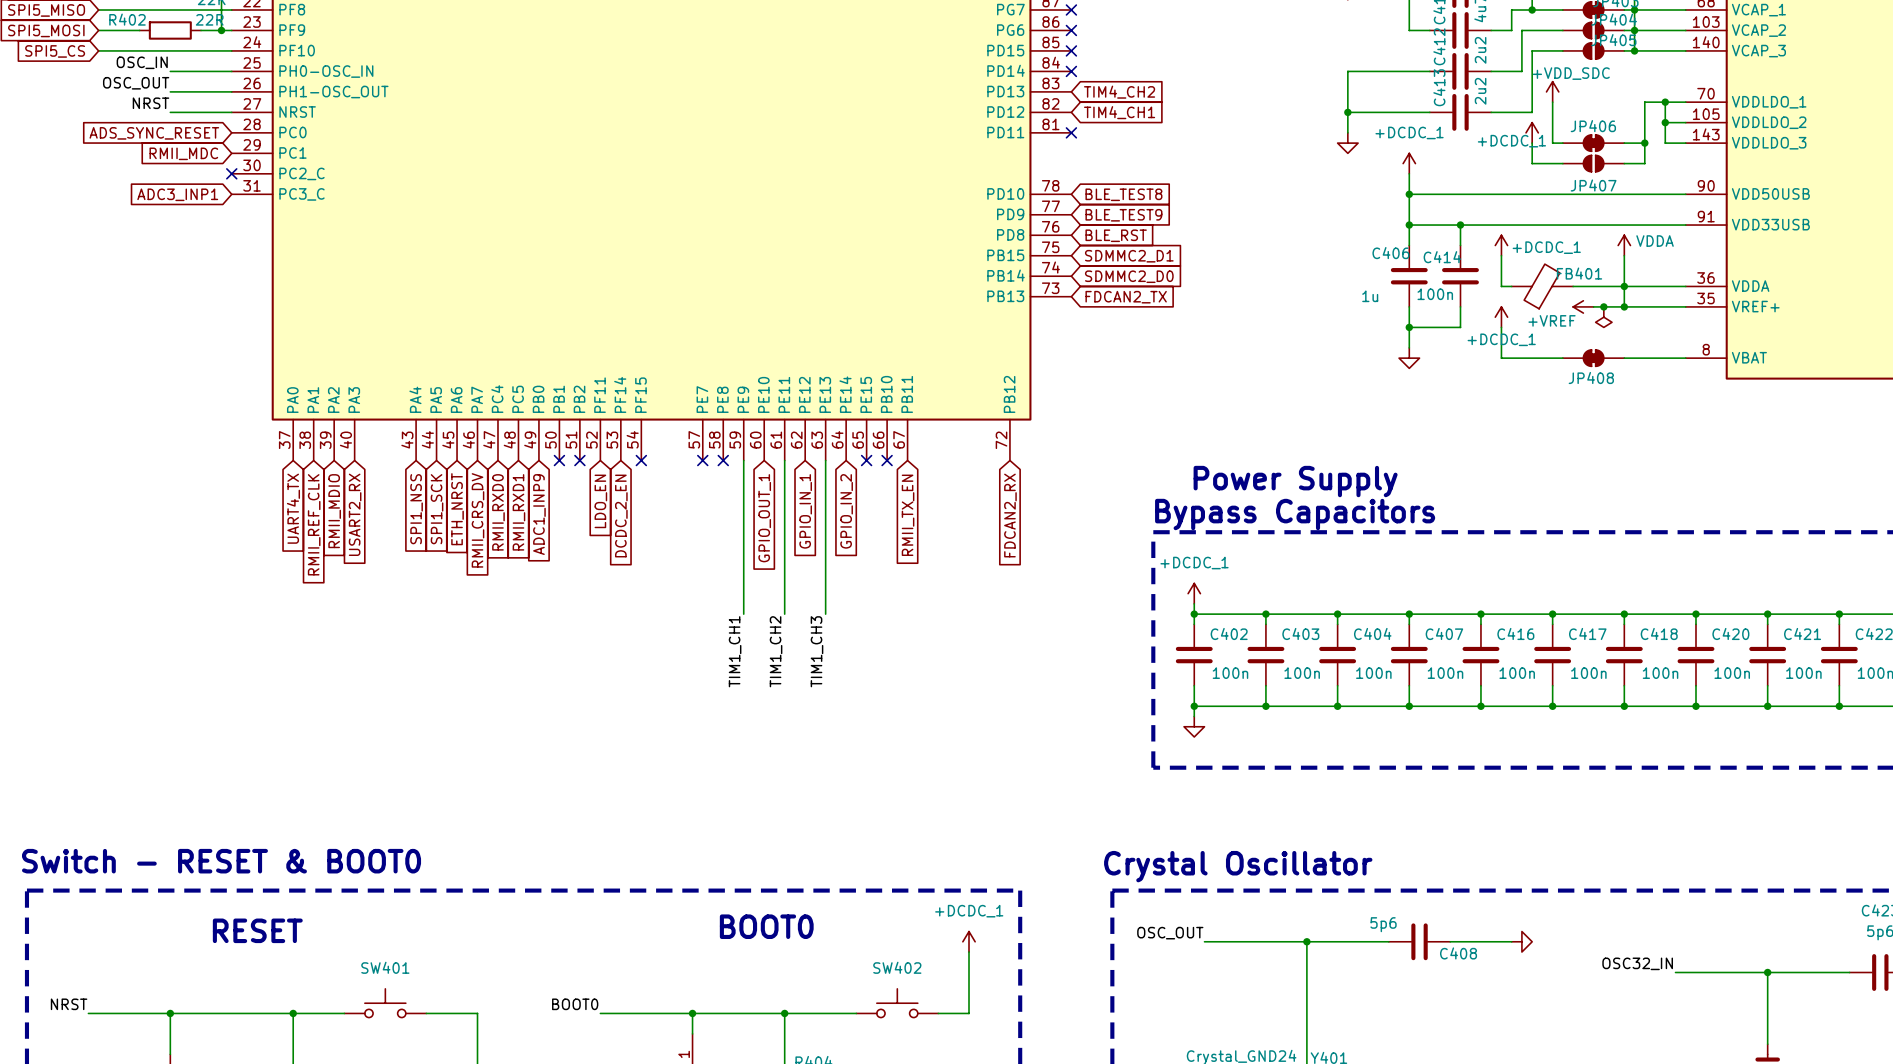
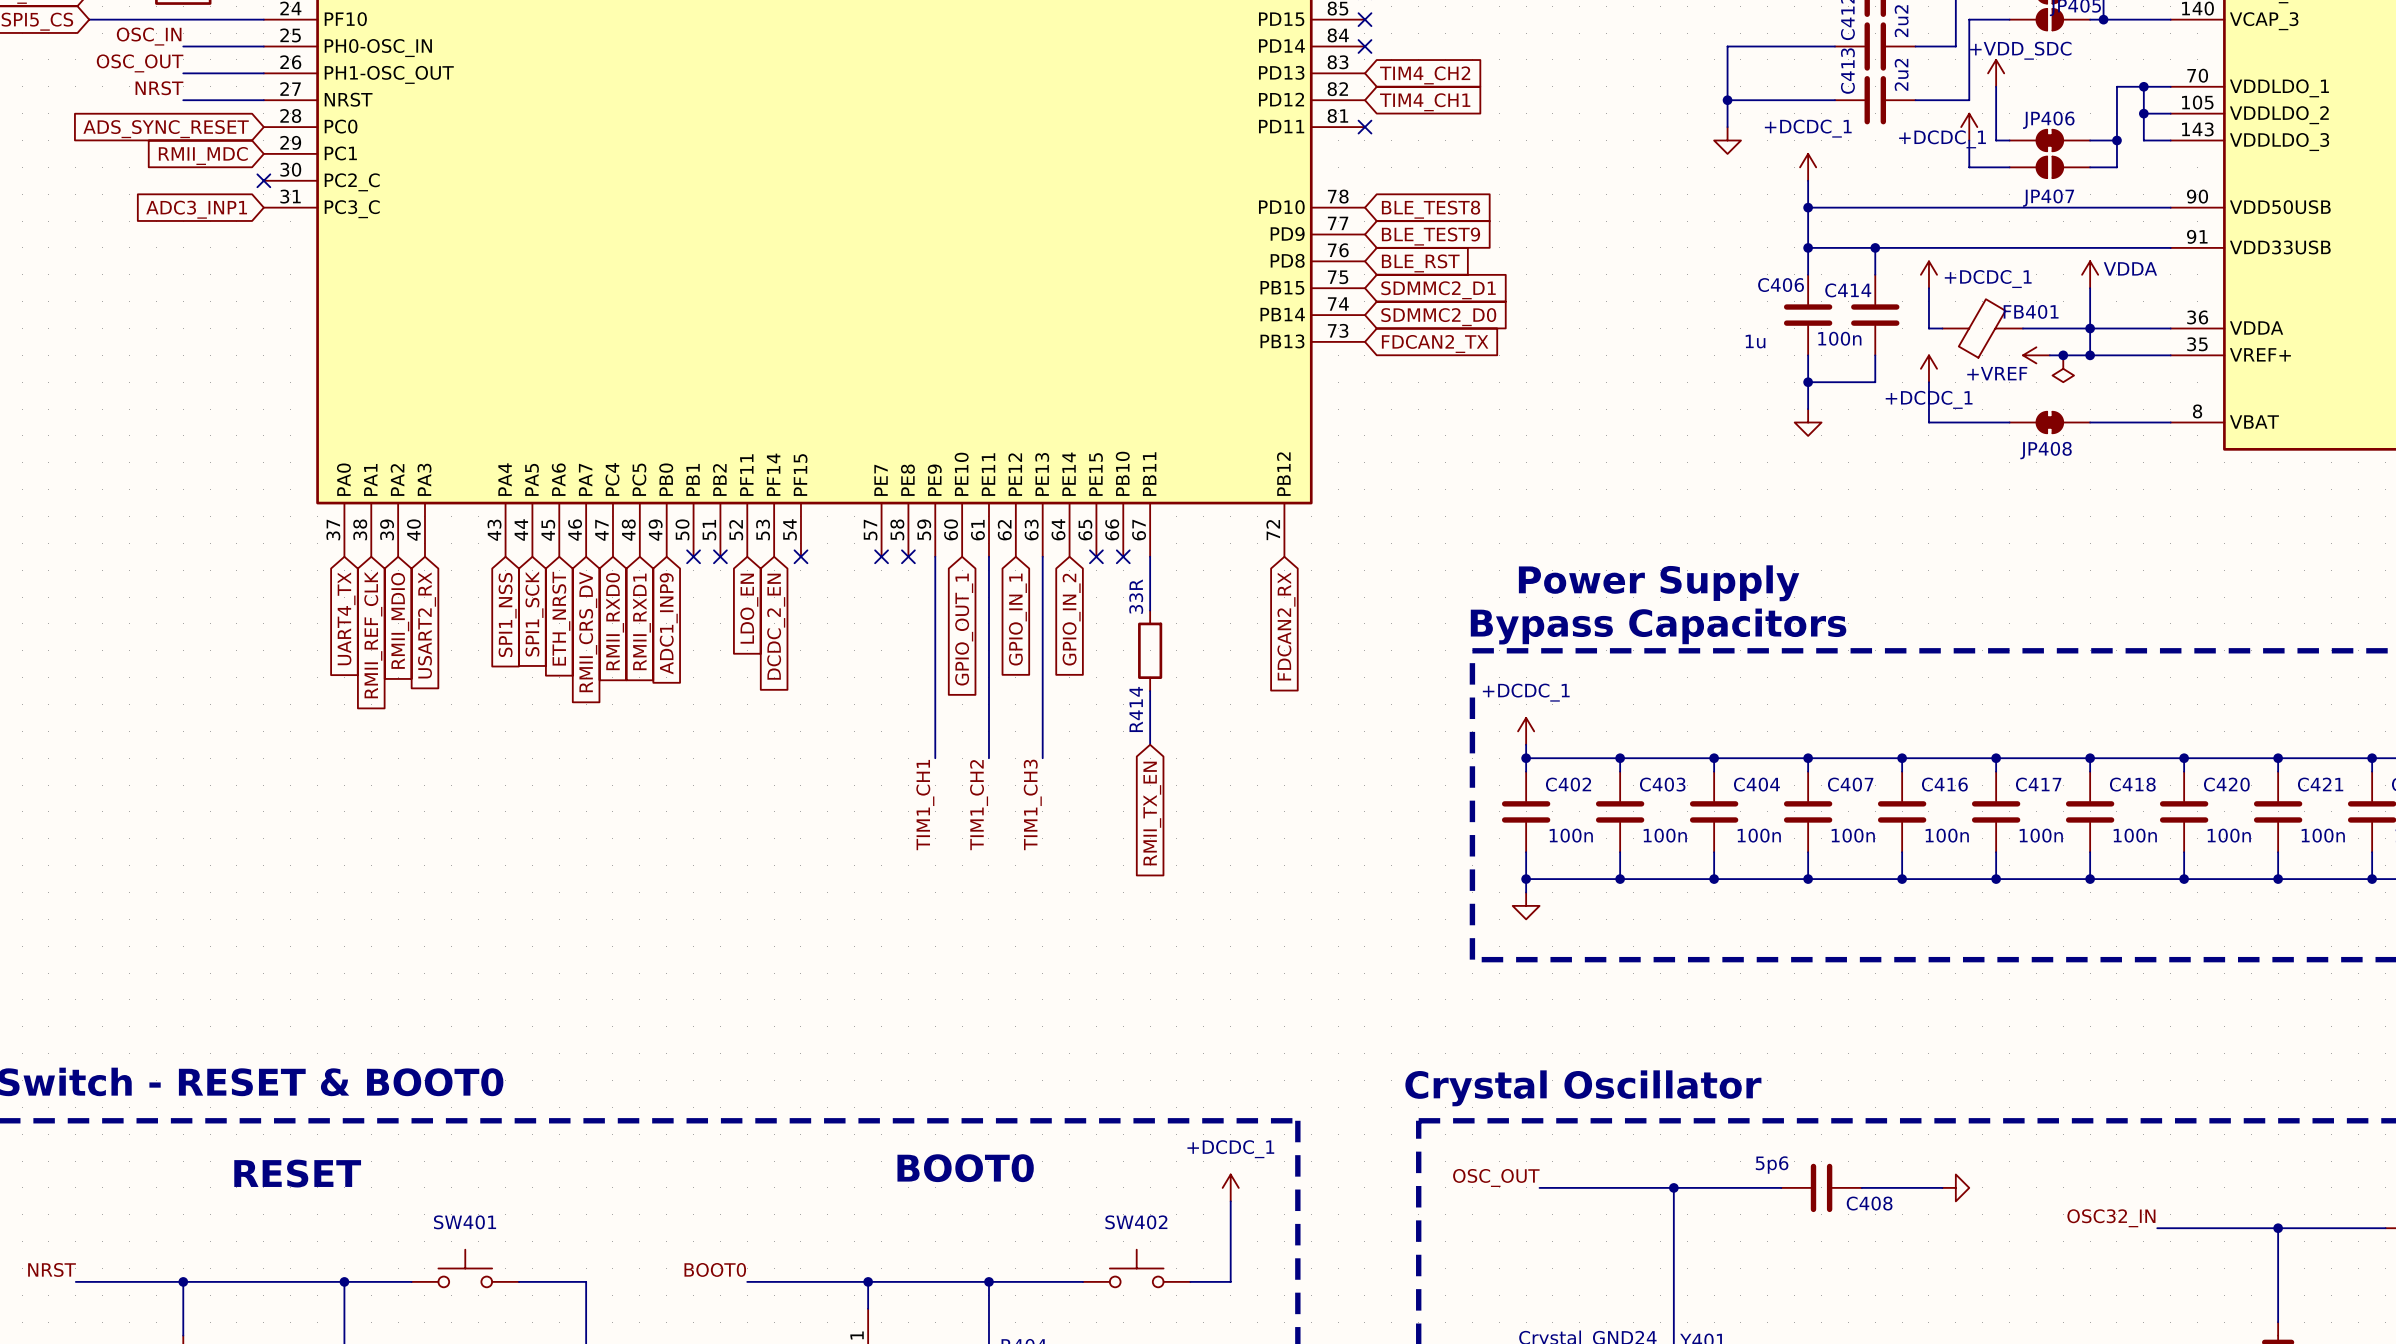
wire: none -> (1150, 556) (1150, 610)
global label position: RMII_TX_EN (908, 515) -> RMII_TX_EN (1152, 813)
R414: none -> 33R (1150, 650)
wire: none -> (1150, 691) (1150, 744)

